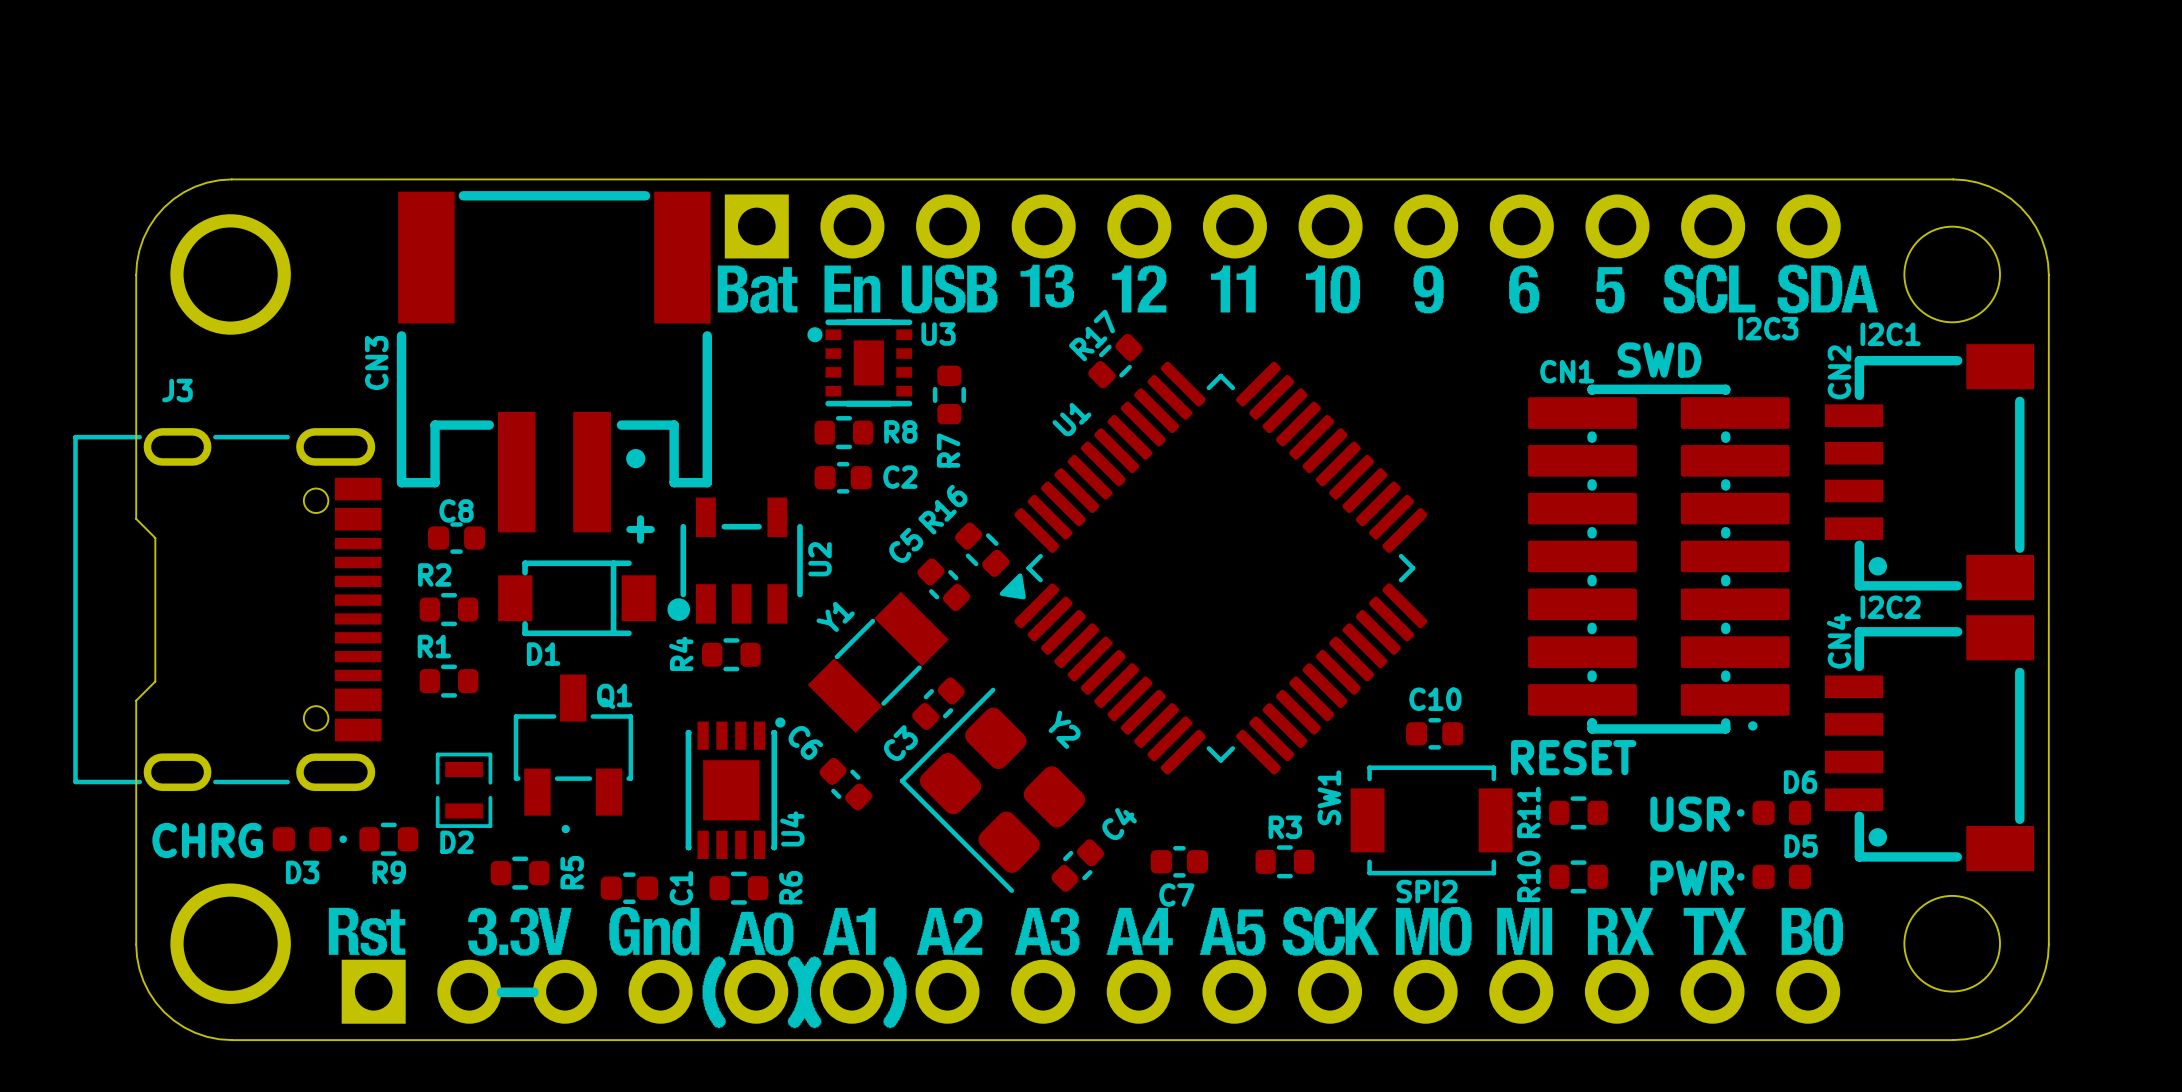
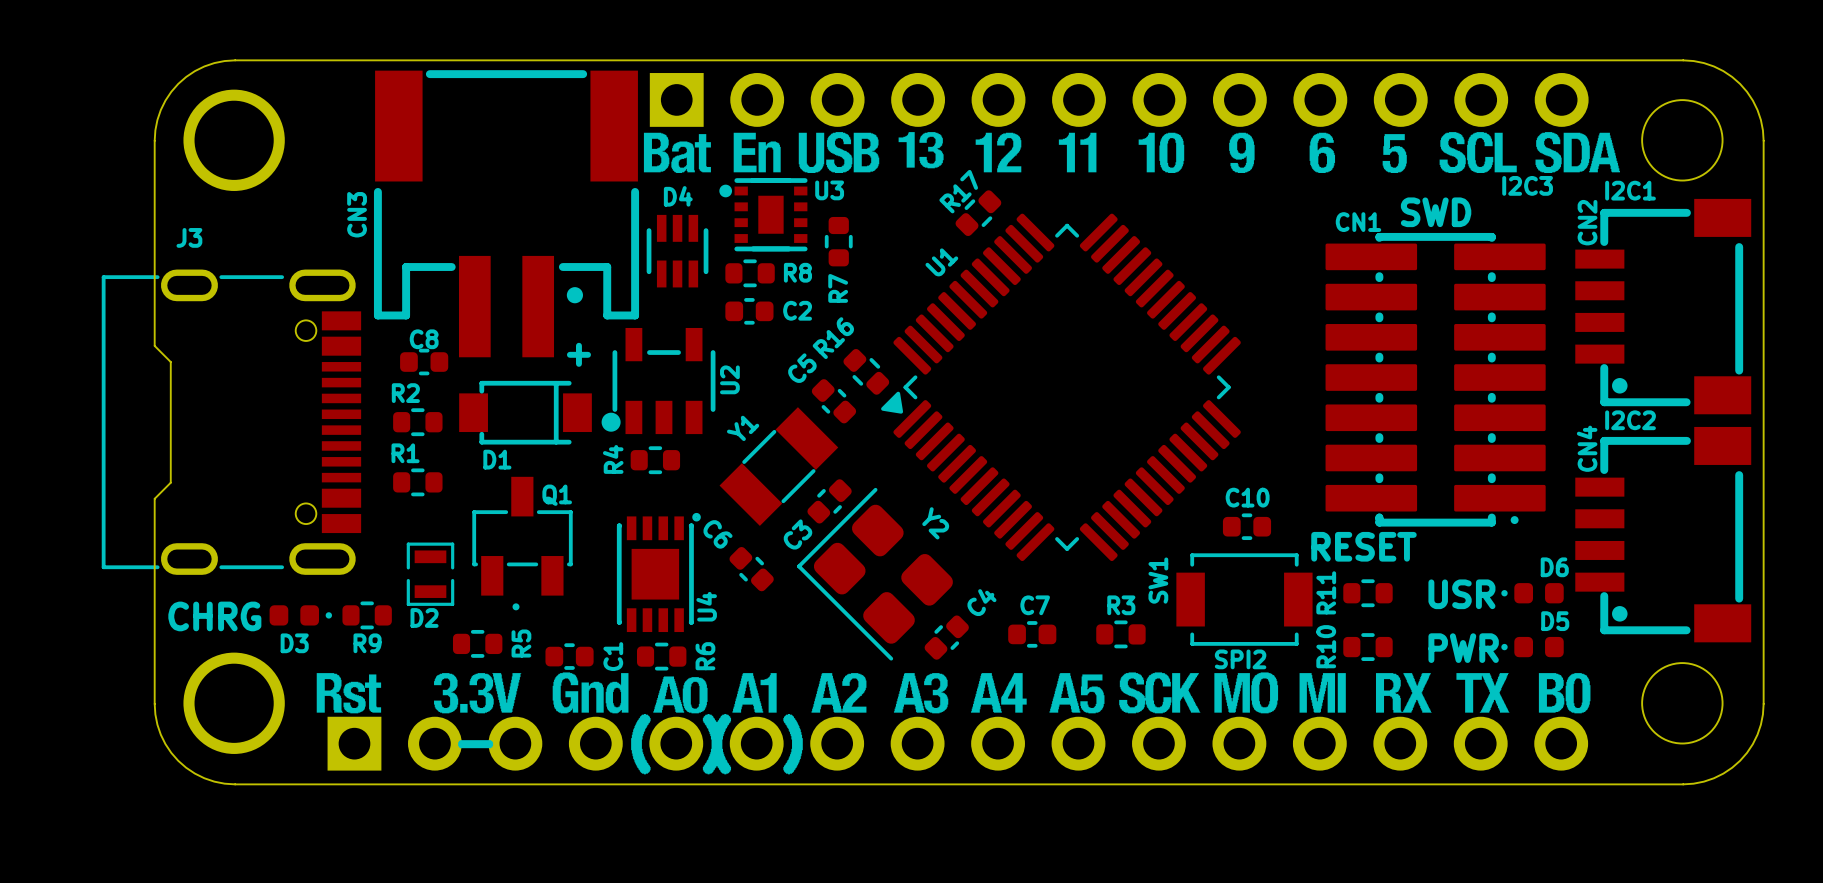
D4: none -> (675, 251)
C7 name position: C7 (1176, 895) -> C7 (1035, 605)

